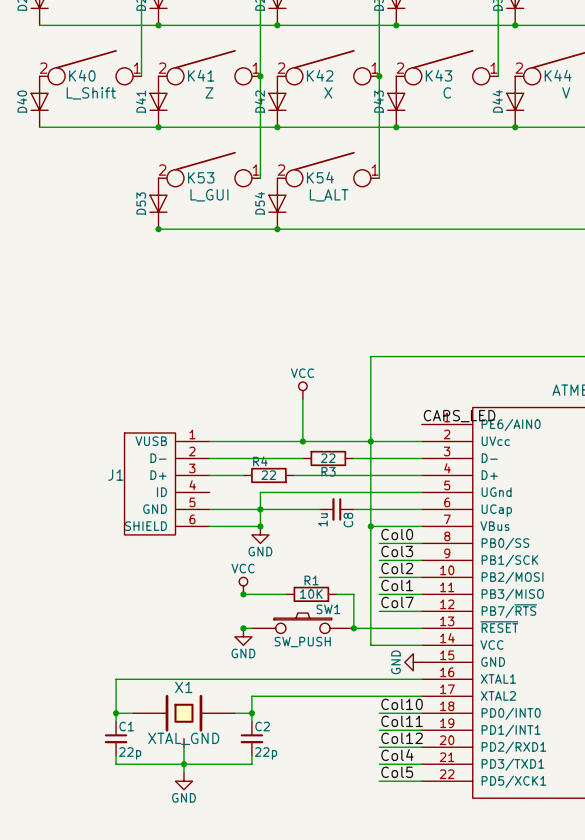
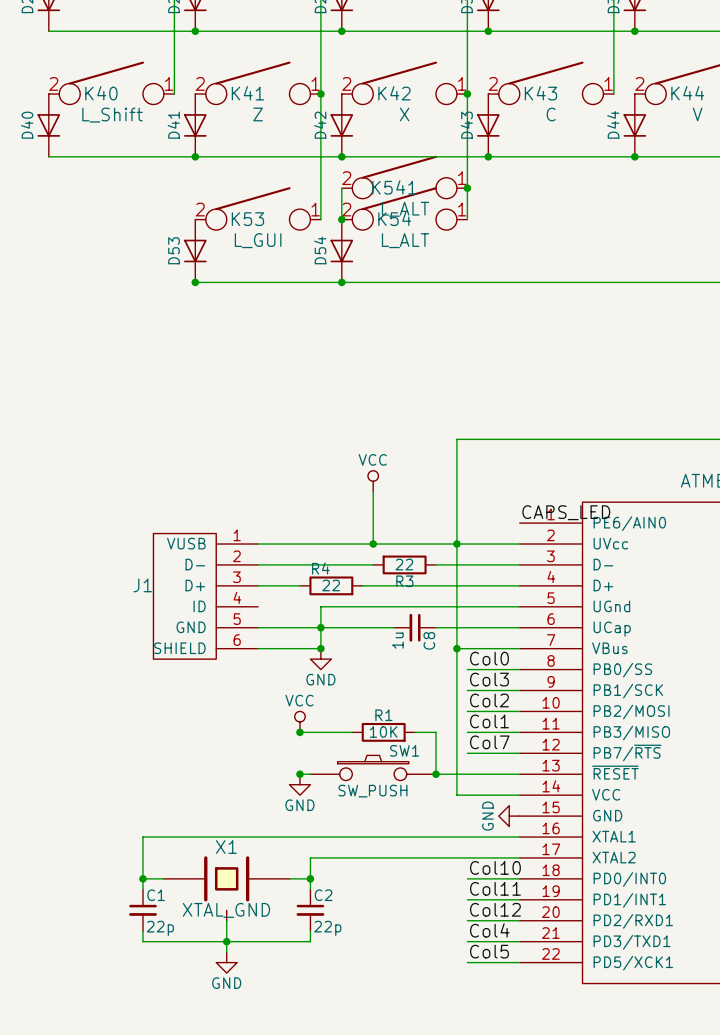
K541: none -> L_ALT (404, 177)
wire: none -> (341, 188) (341, 219)
junction: none -> (467, 188)
junction: none -> (341, 219)

